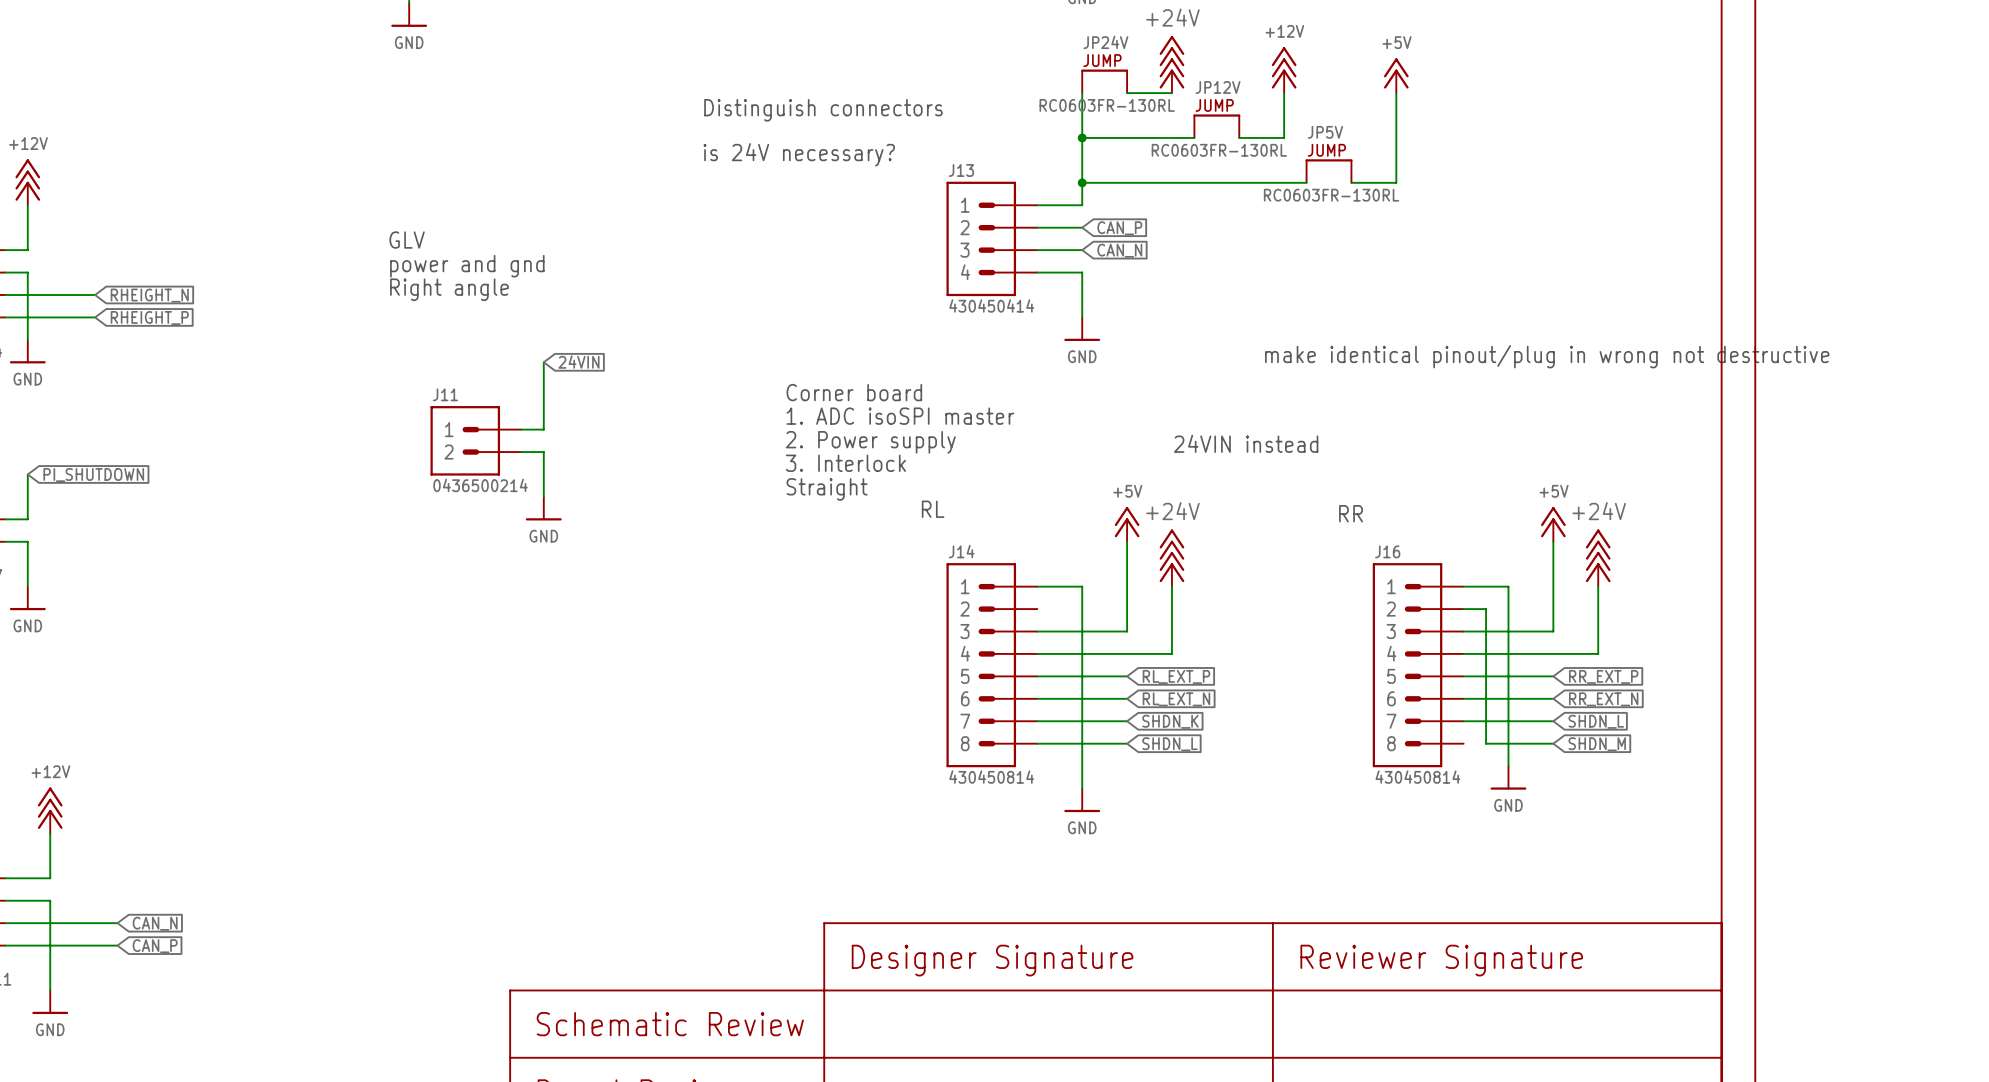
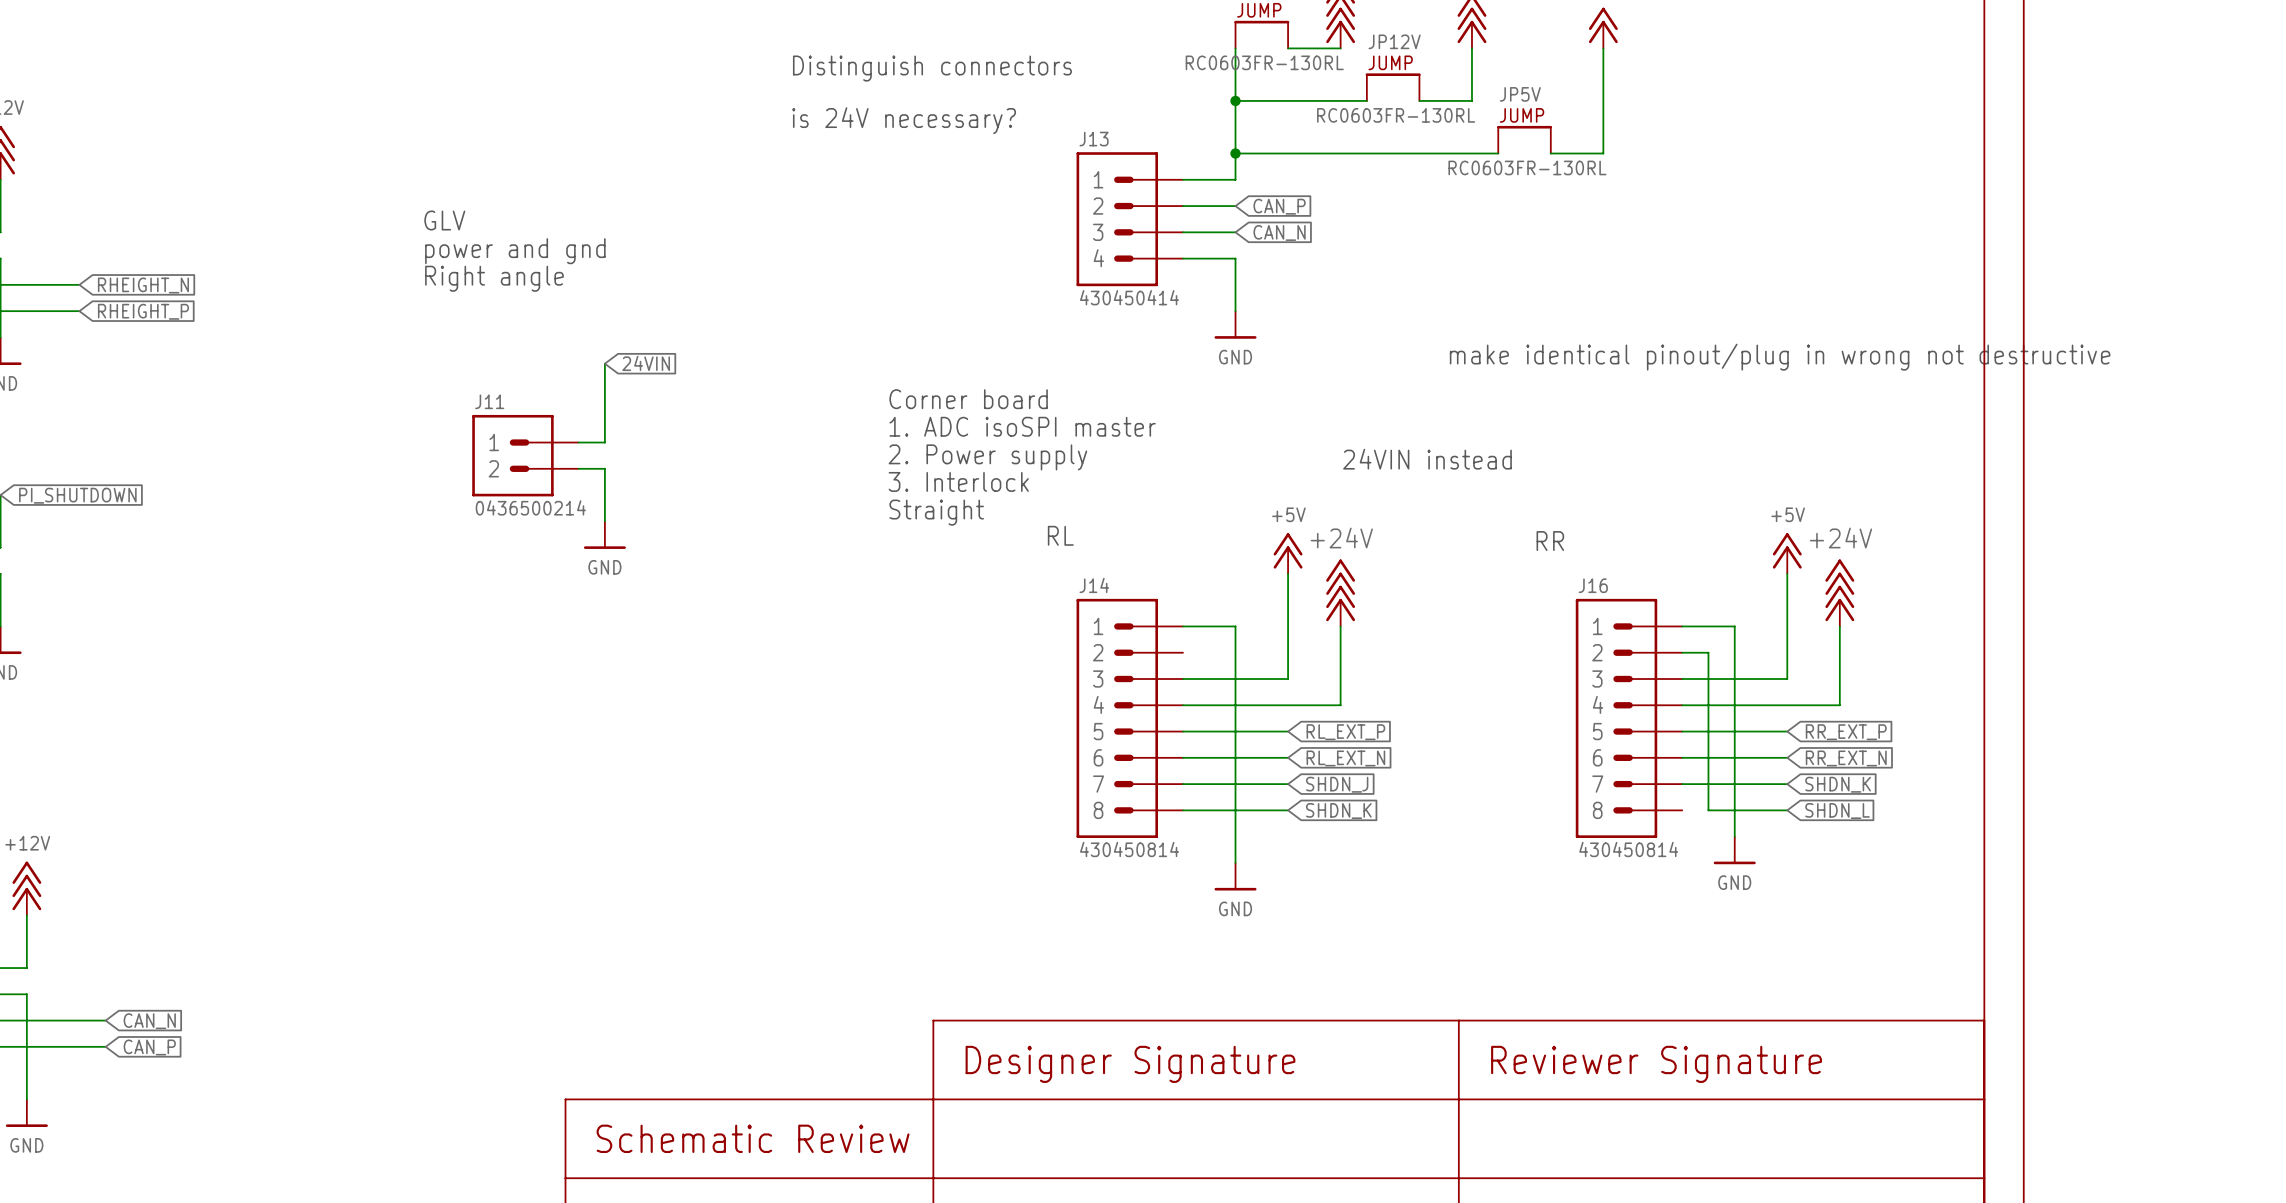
global label: SHDN_K (1170, 721) -> SHDN_J (1337, 784)
global label: SHDN_L (1596, 721) -> SHDN_K (1838, 784)
global label: SHDN_L (1169, 744) -> SHDN_K (1338, 811)
global label: SHDN_M (1597, 744) -> SHDN_L (1837, 811)

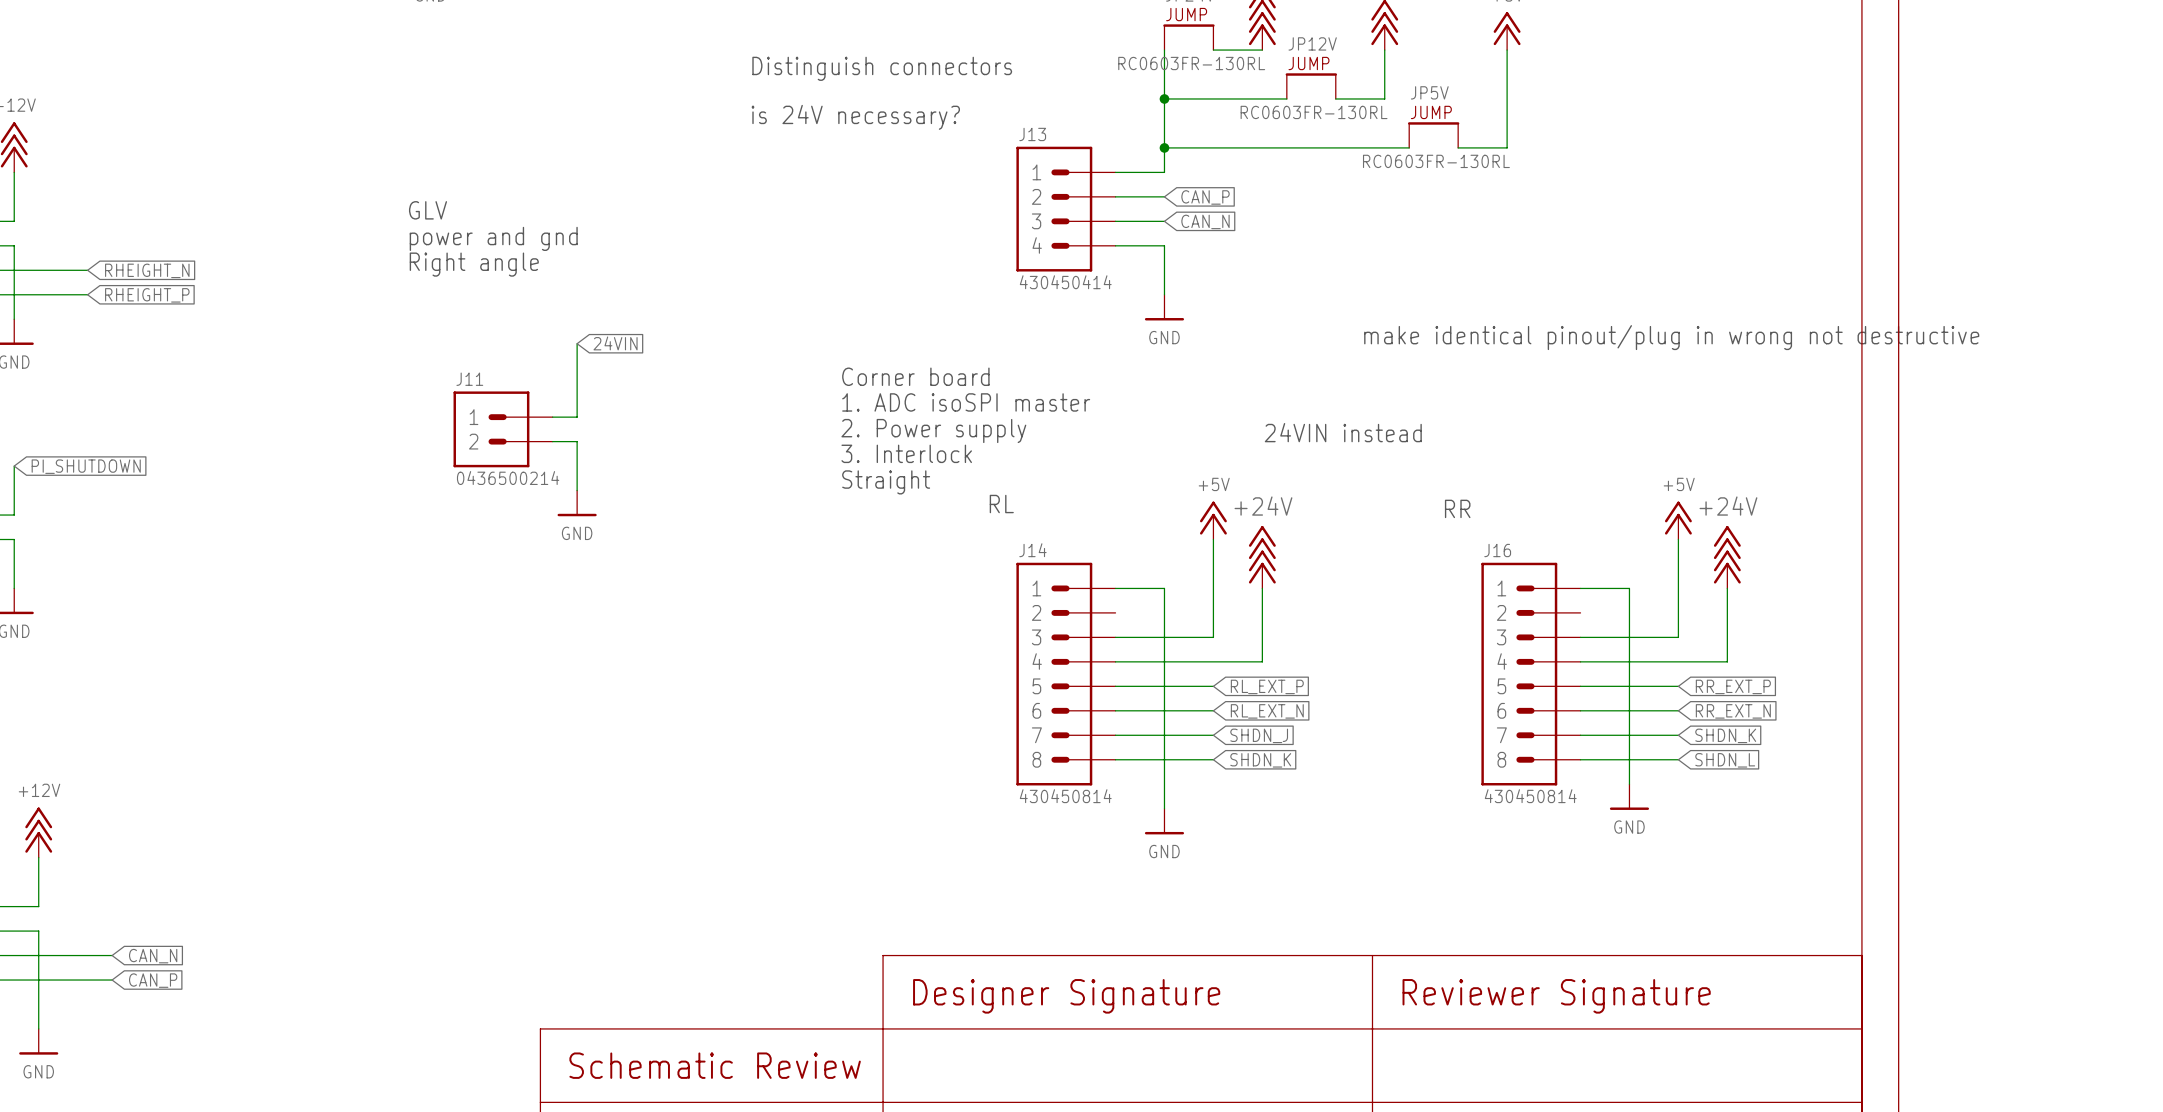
wire: (1682, 652) (1708, 652) (1708, 810) -> (1580, 759) (1604, 759)

